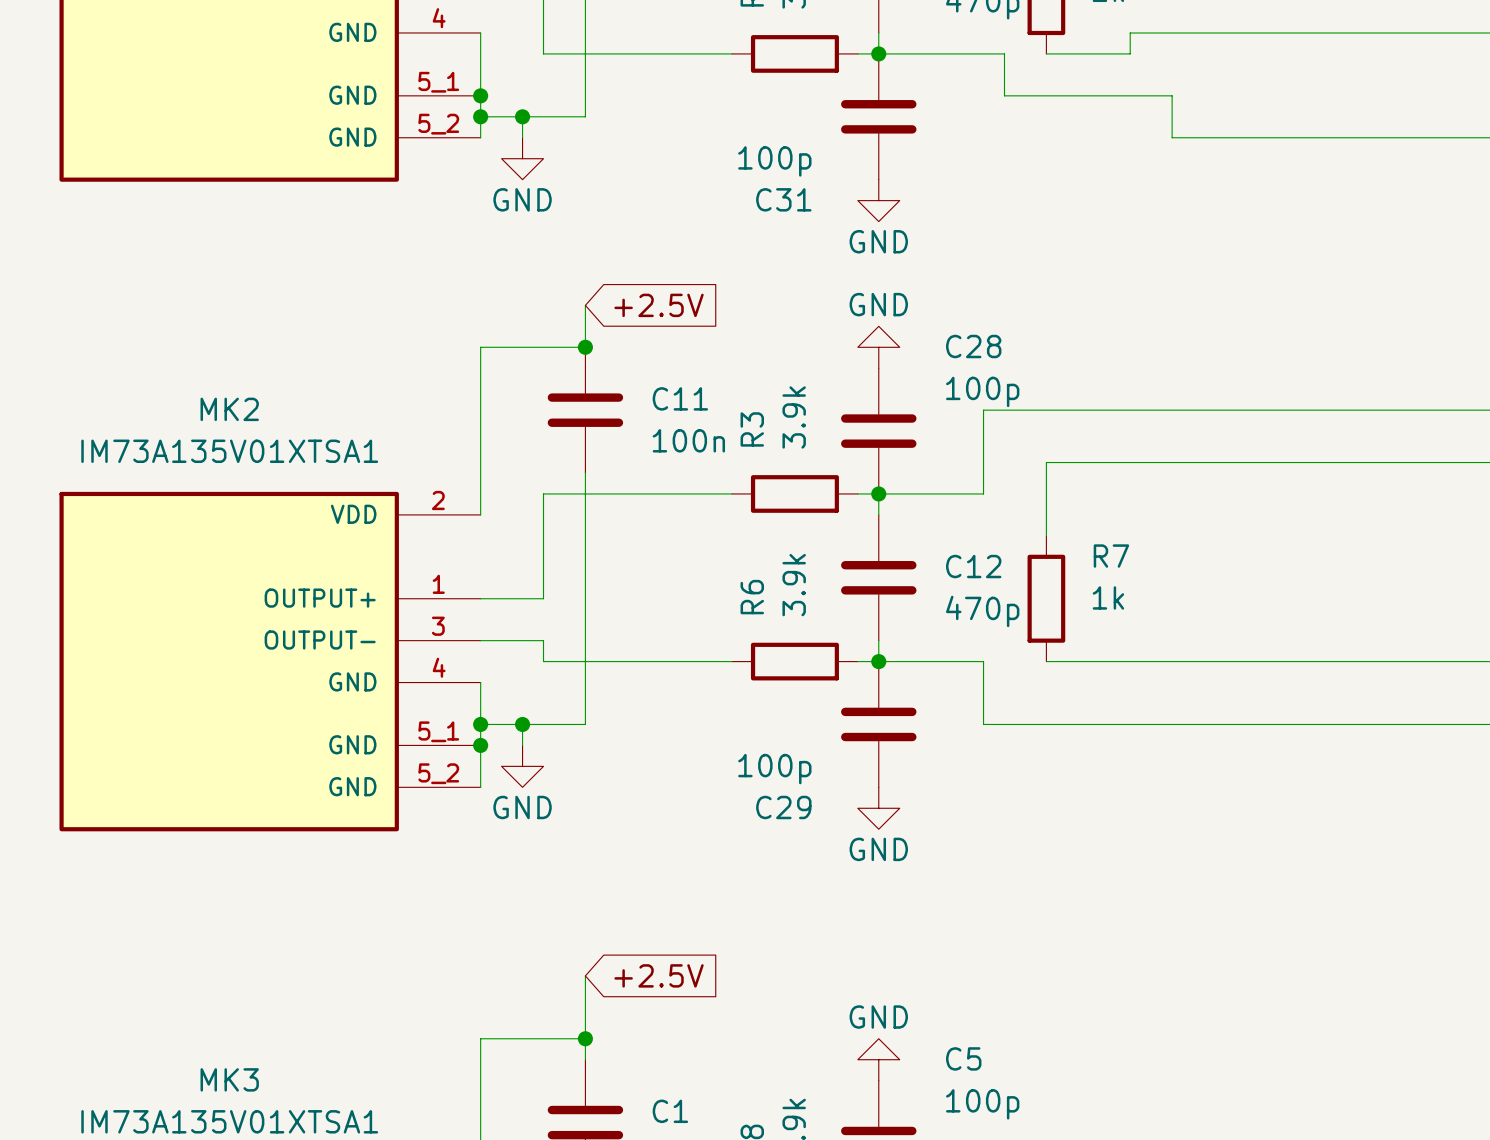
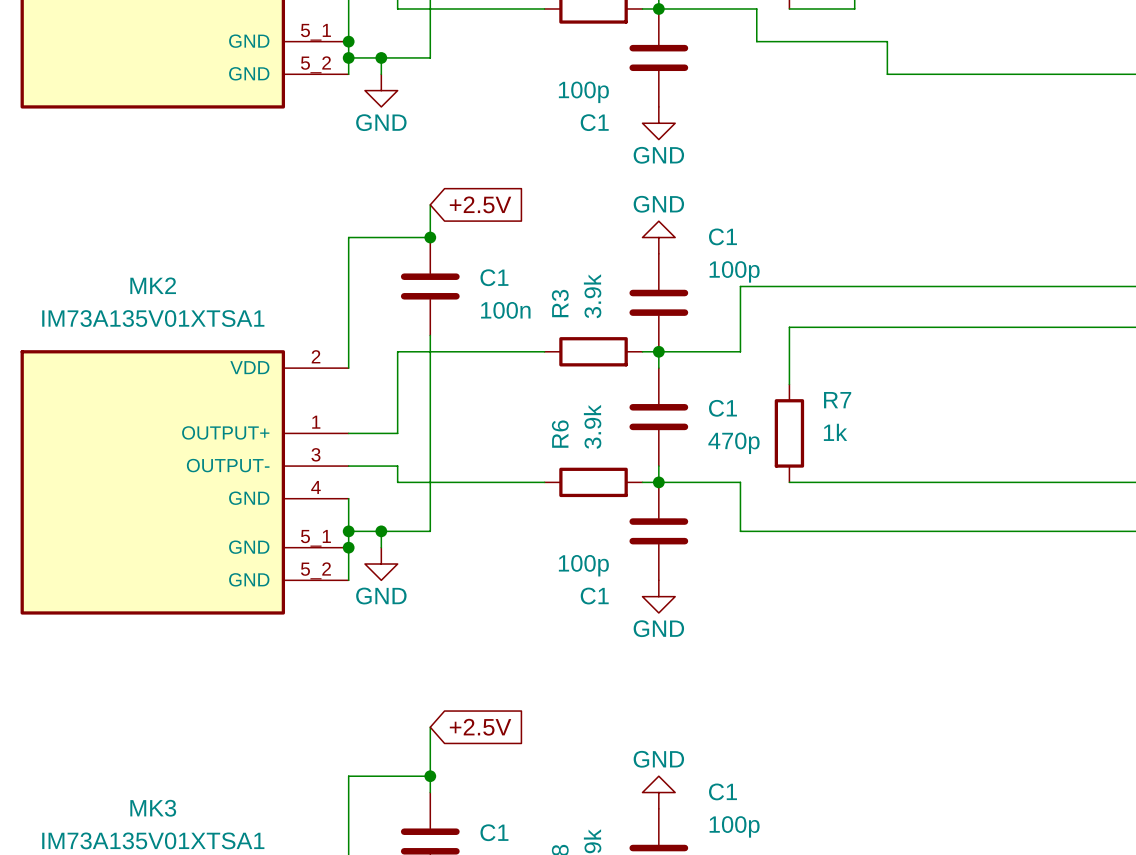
C31 name: C31 (783, 199) -> C1 (594, 122)
C28 name: C28 (973, 346) -> C1 (722, 236)
C11 name: C11 (680, 398) -> C1 (494, 277)
C12 name: C12 (973, 566) -> C1 (722, 408)
C29 name: C29 (783, 807) -> C1 (594, 596)
C5 name: C5 (963, 1058) -> C1 (722, 791)

